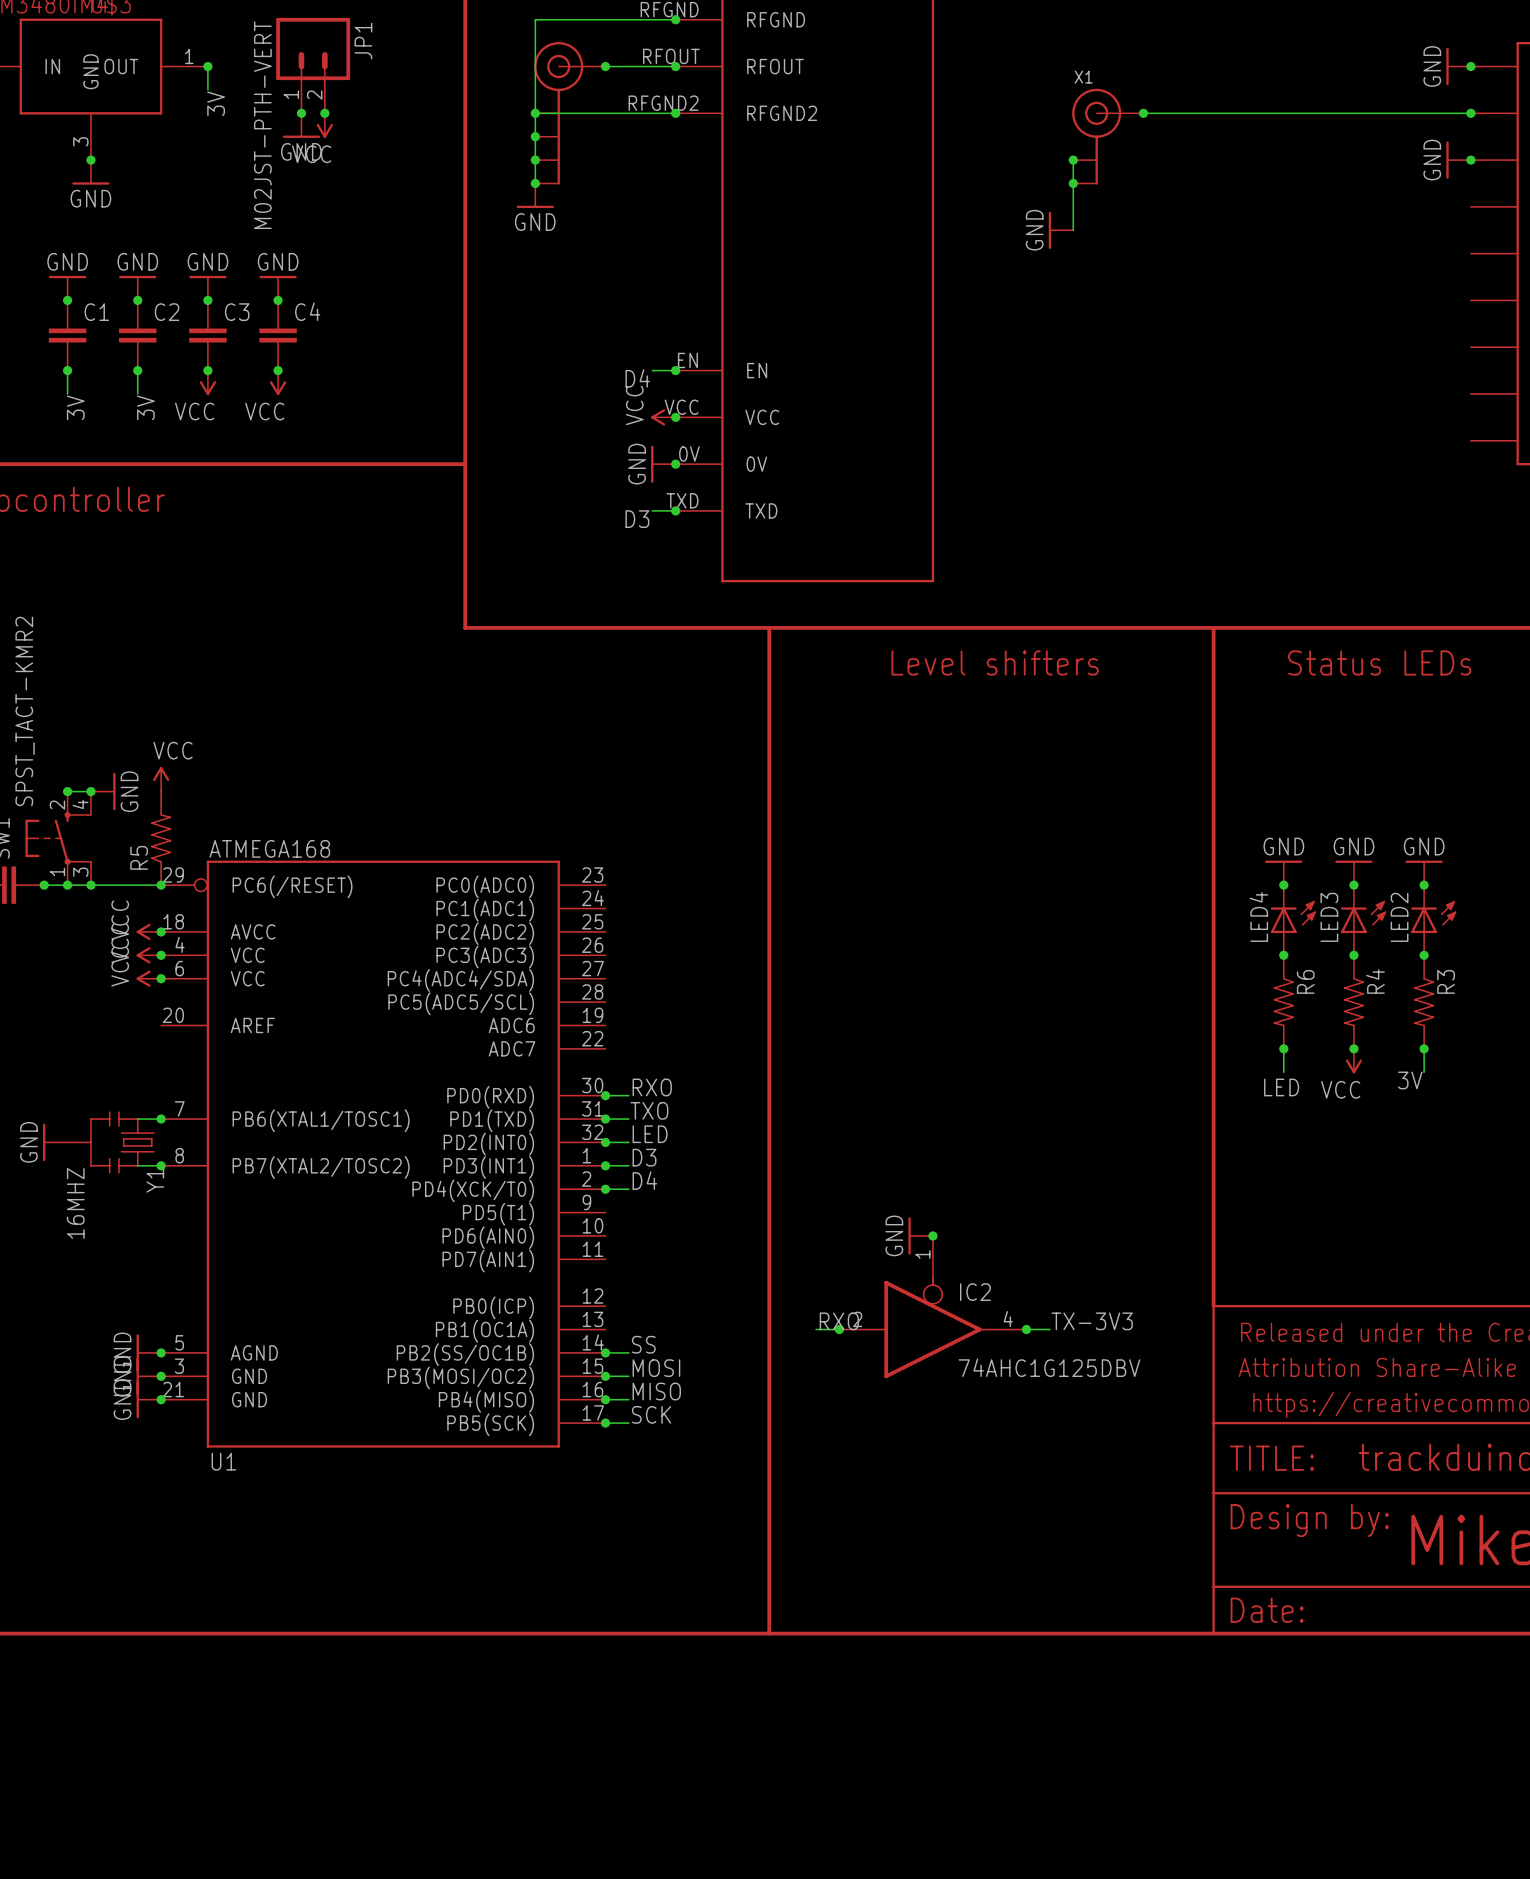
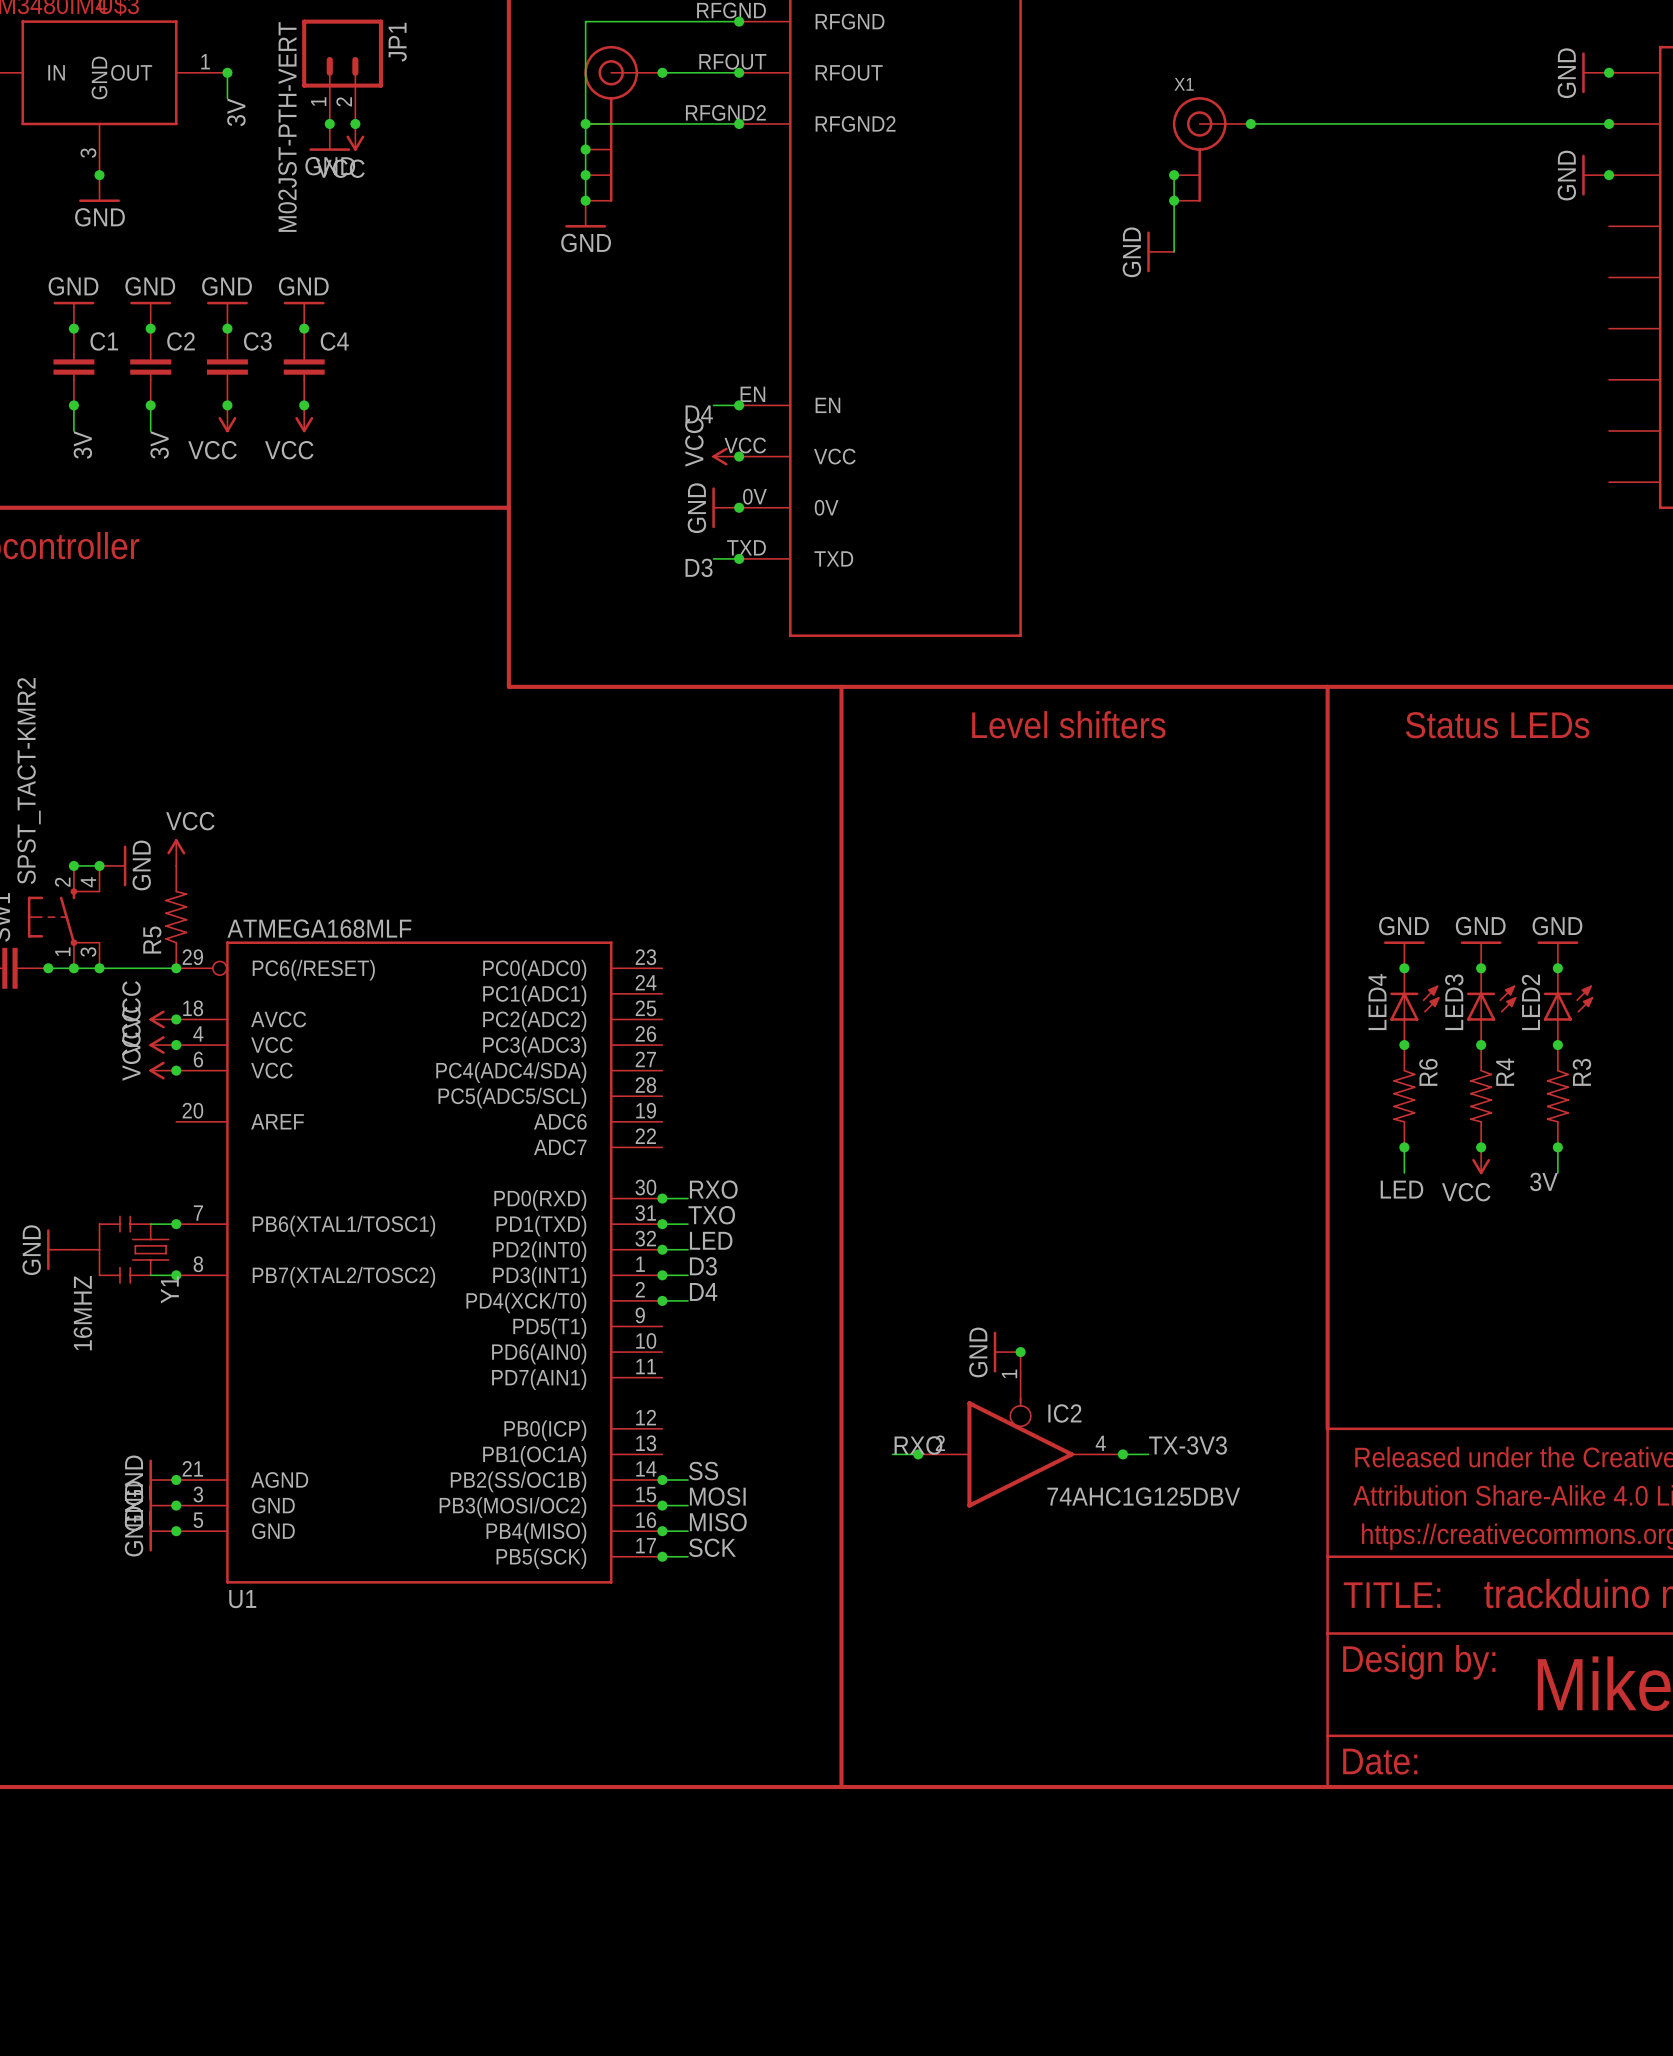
U1 value: ATMEGA168 (269, 848) -> ATMEGA168MLF (319, 928)
U1 pin number: 5 (179, 1342) -> 21 (192, 1468)
U1 pin number: 21 (173, 1389) -> 5 (198, 1520)

